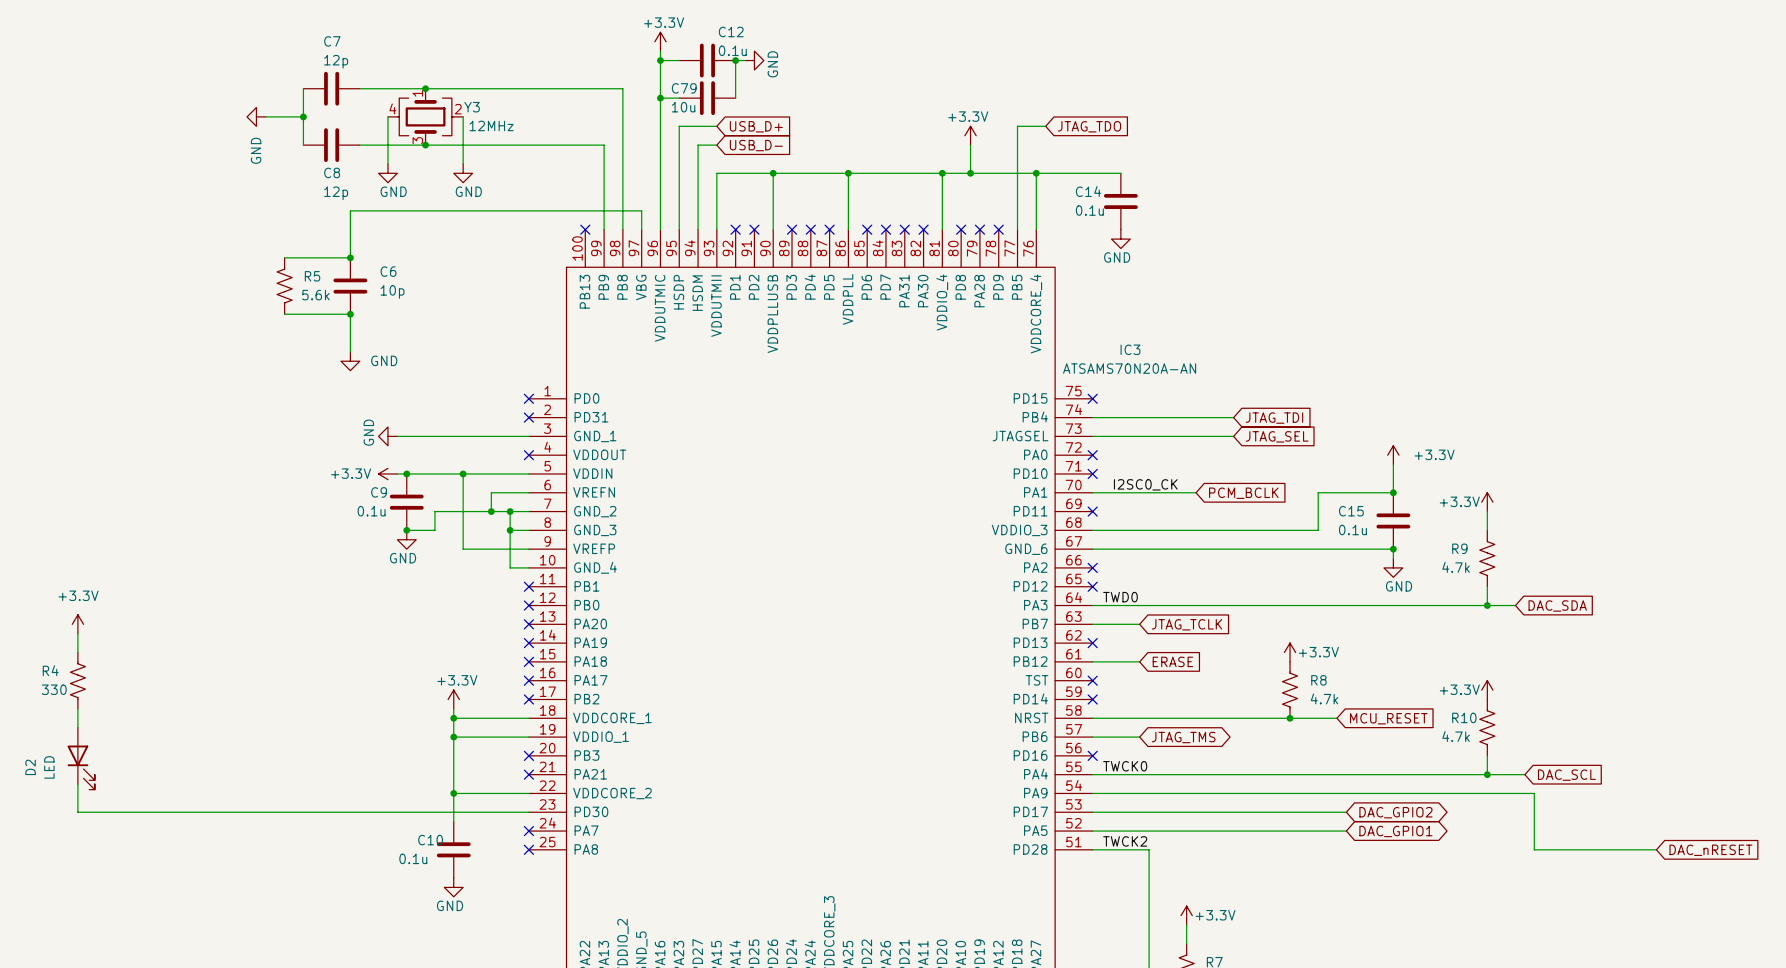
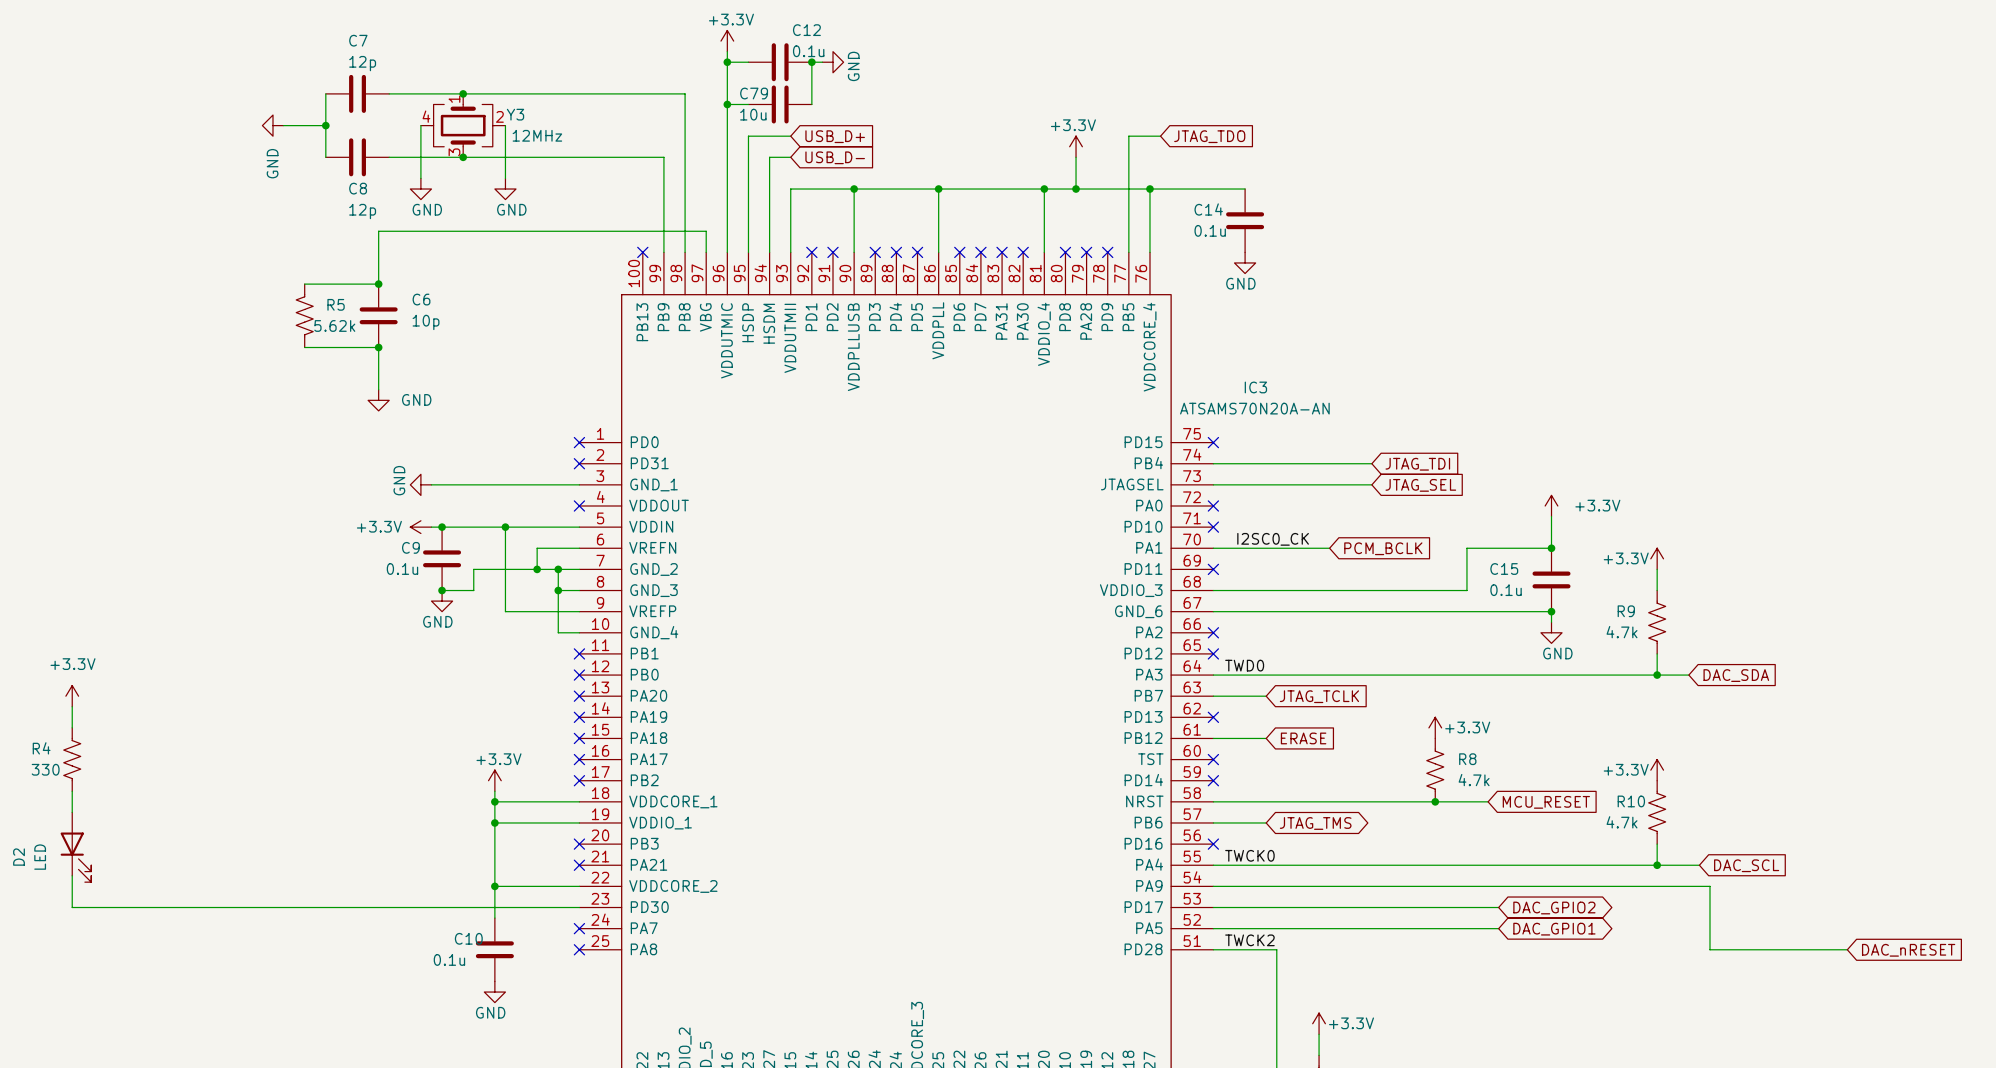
R5 value: 5.6k (315, 295) -> 5.62k (334, 325)

